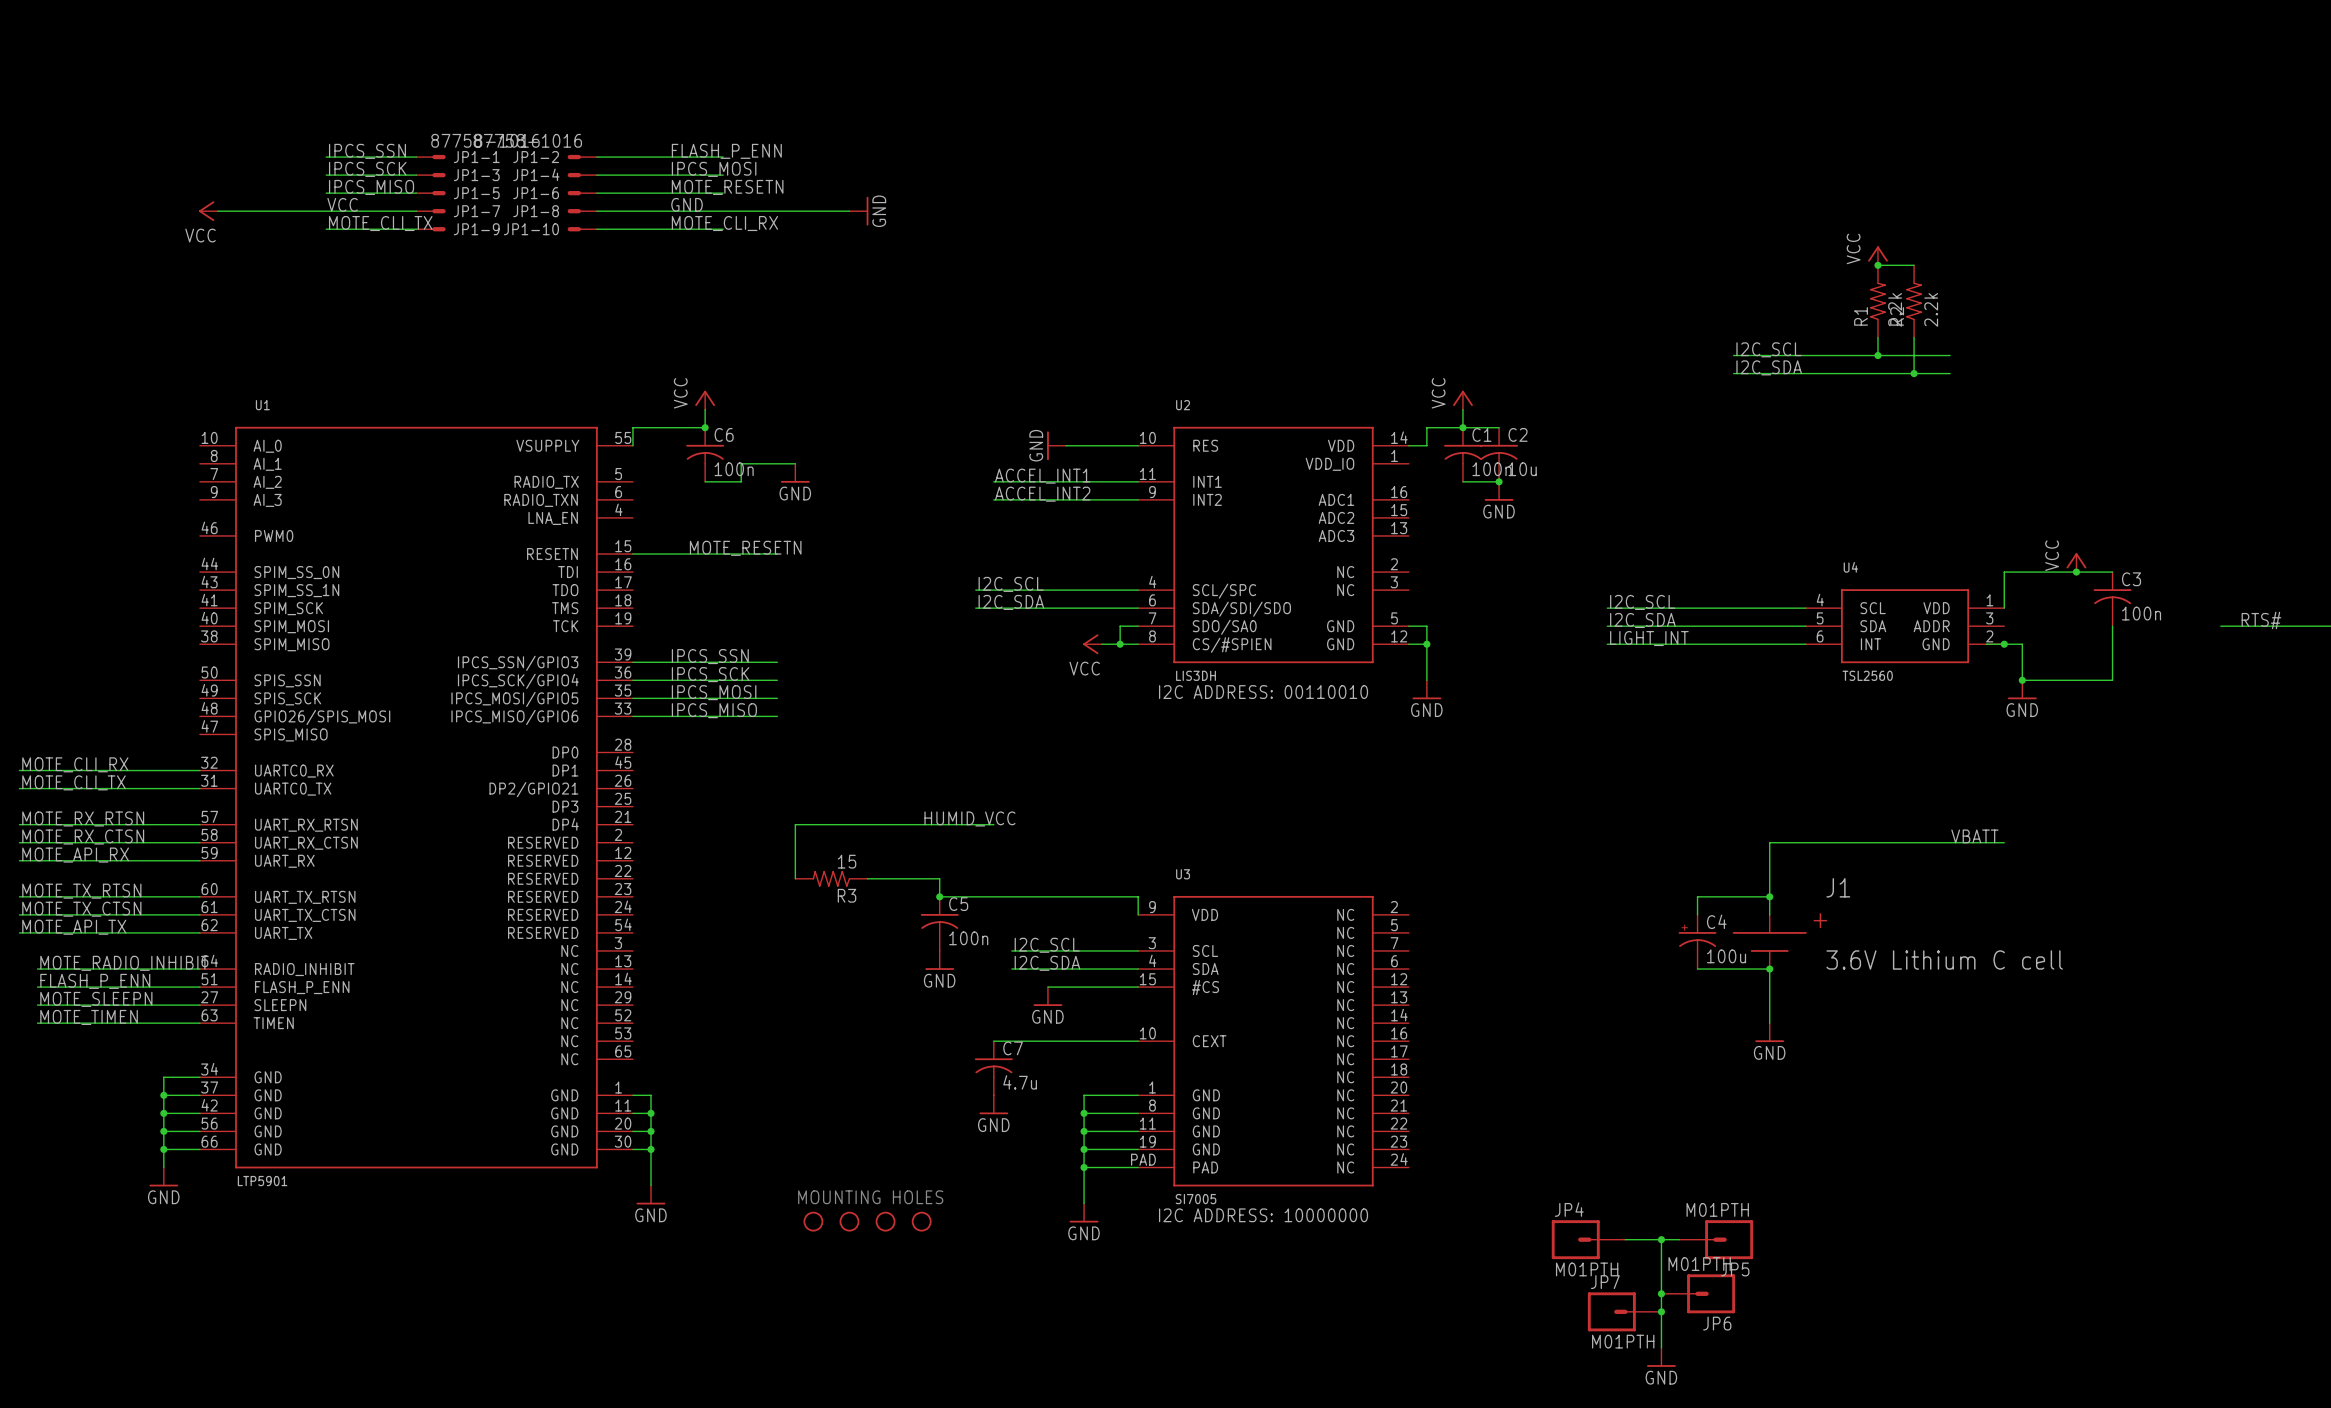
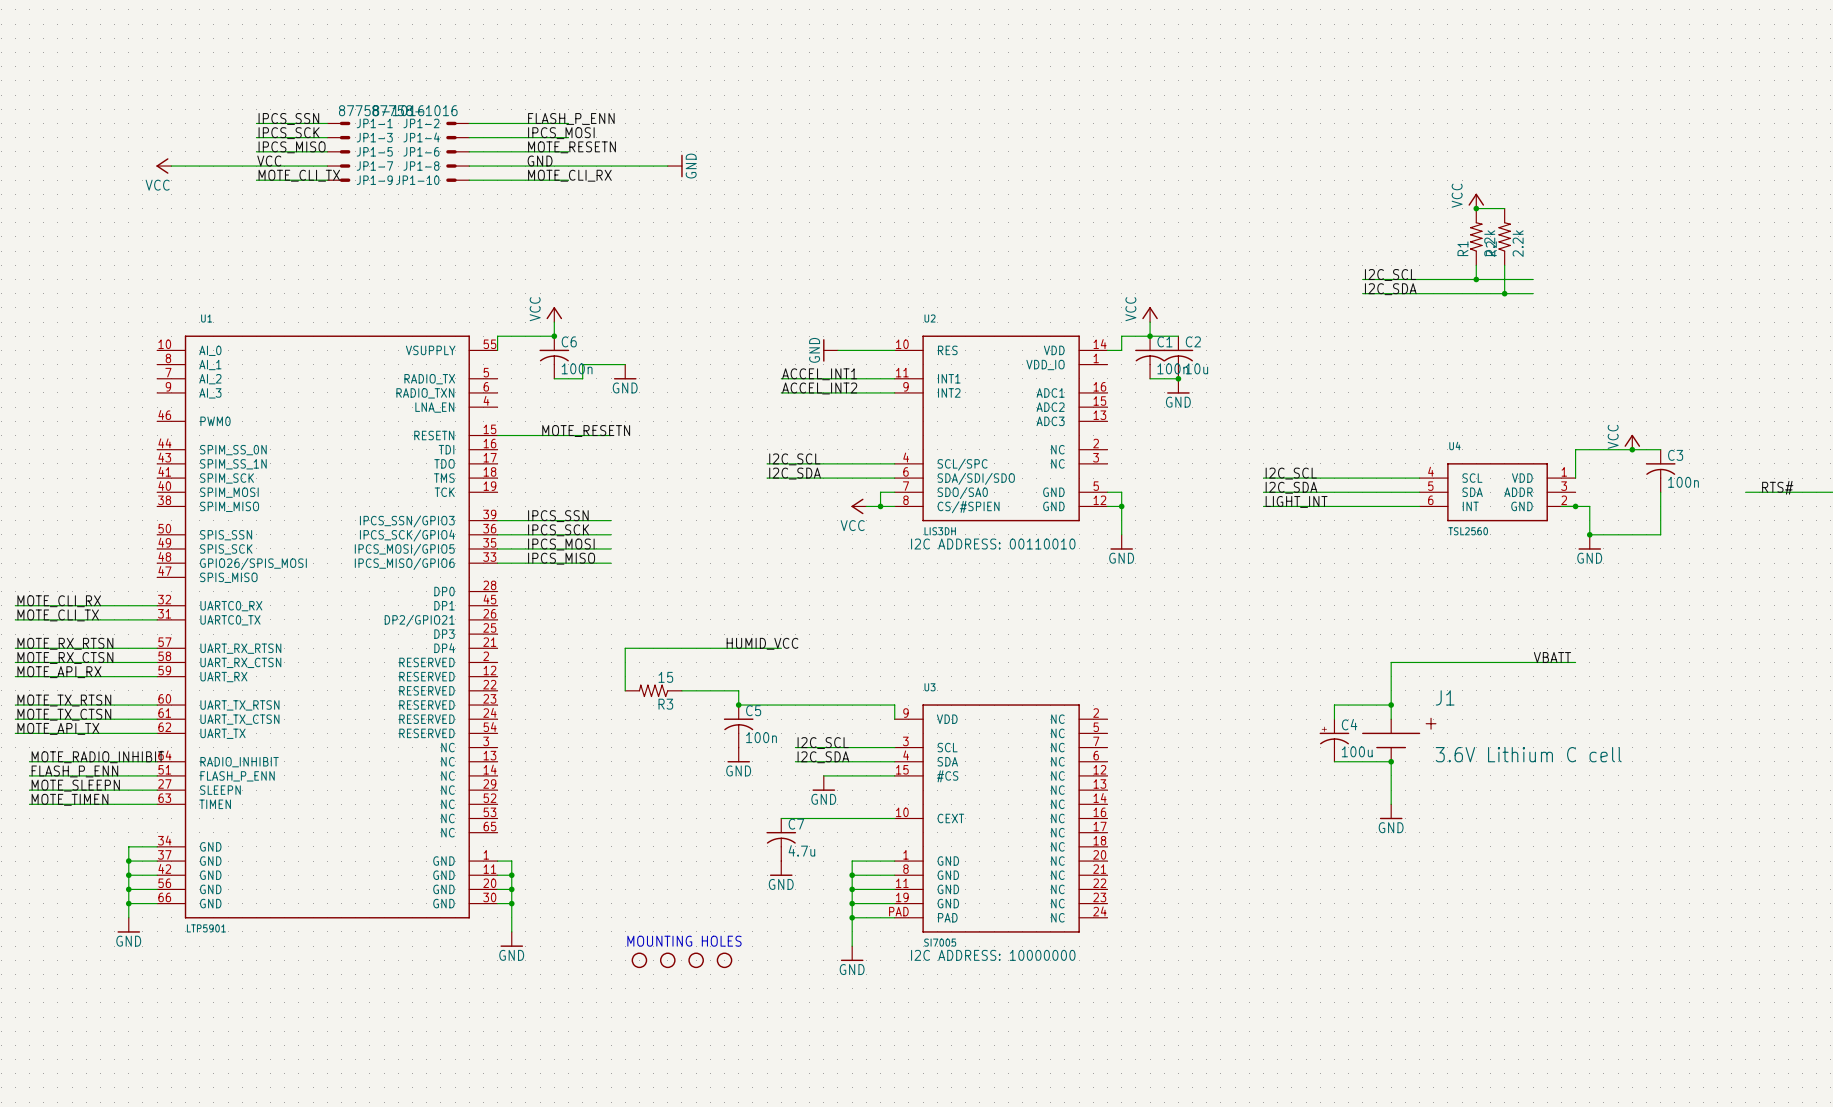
JP4: M01PTH (1588, 1239) -> none
wire: (1625, 1239) (1679, 1239) -> none
wire: (1661, 1239) (1661, 1347) -> none
junction: (1661, 1239) -> none
JP5: M01PTH (1716, 1239) -> none
junction: (1661, 1293) -> none
JP6: M01PTH (1698, 1293) -> none
JP7: M01PTH (1624, 1311) -> none
junction: (1661, 1311) -> none
power symbol: GND (1661, 1357) -> none

